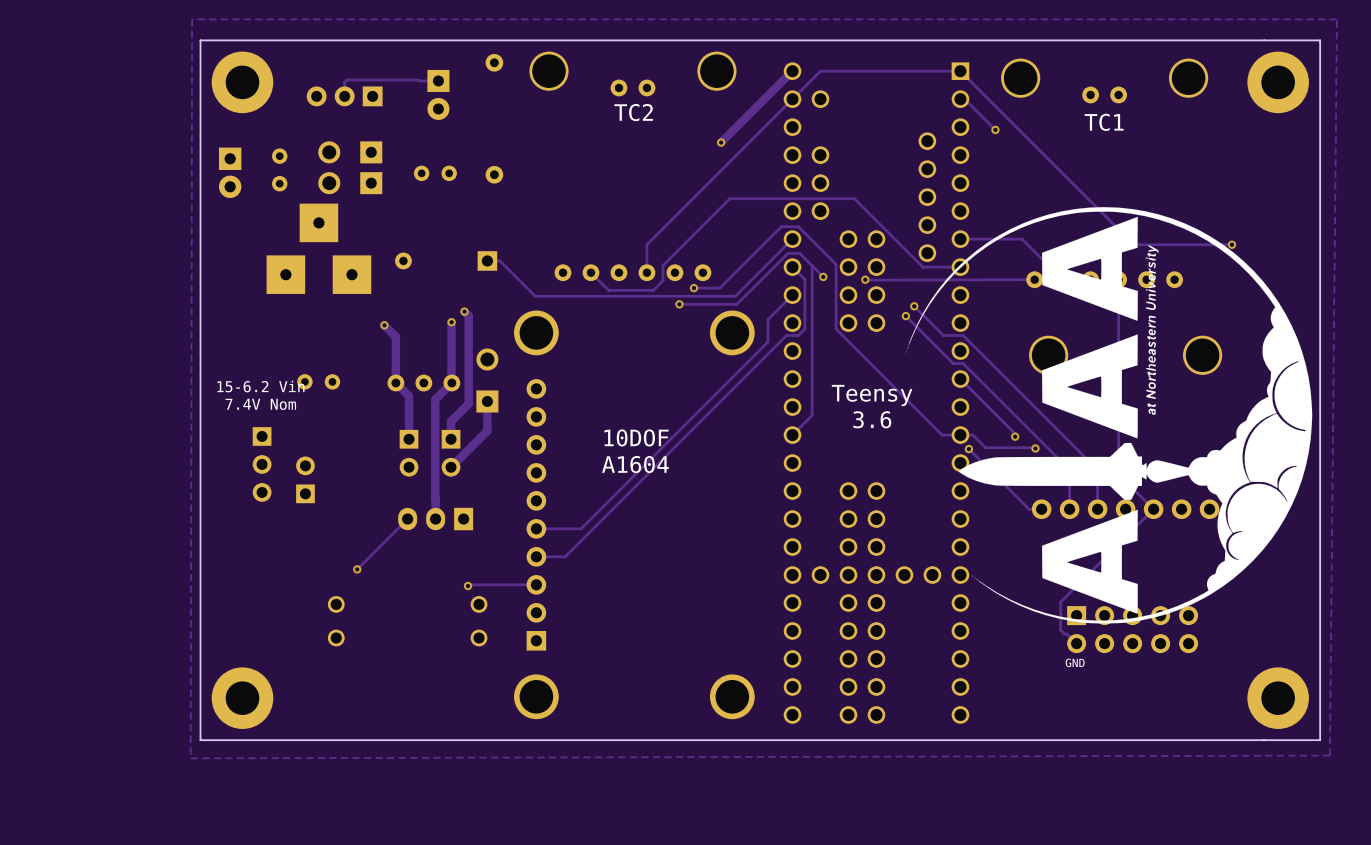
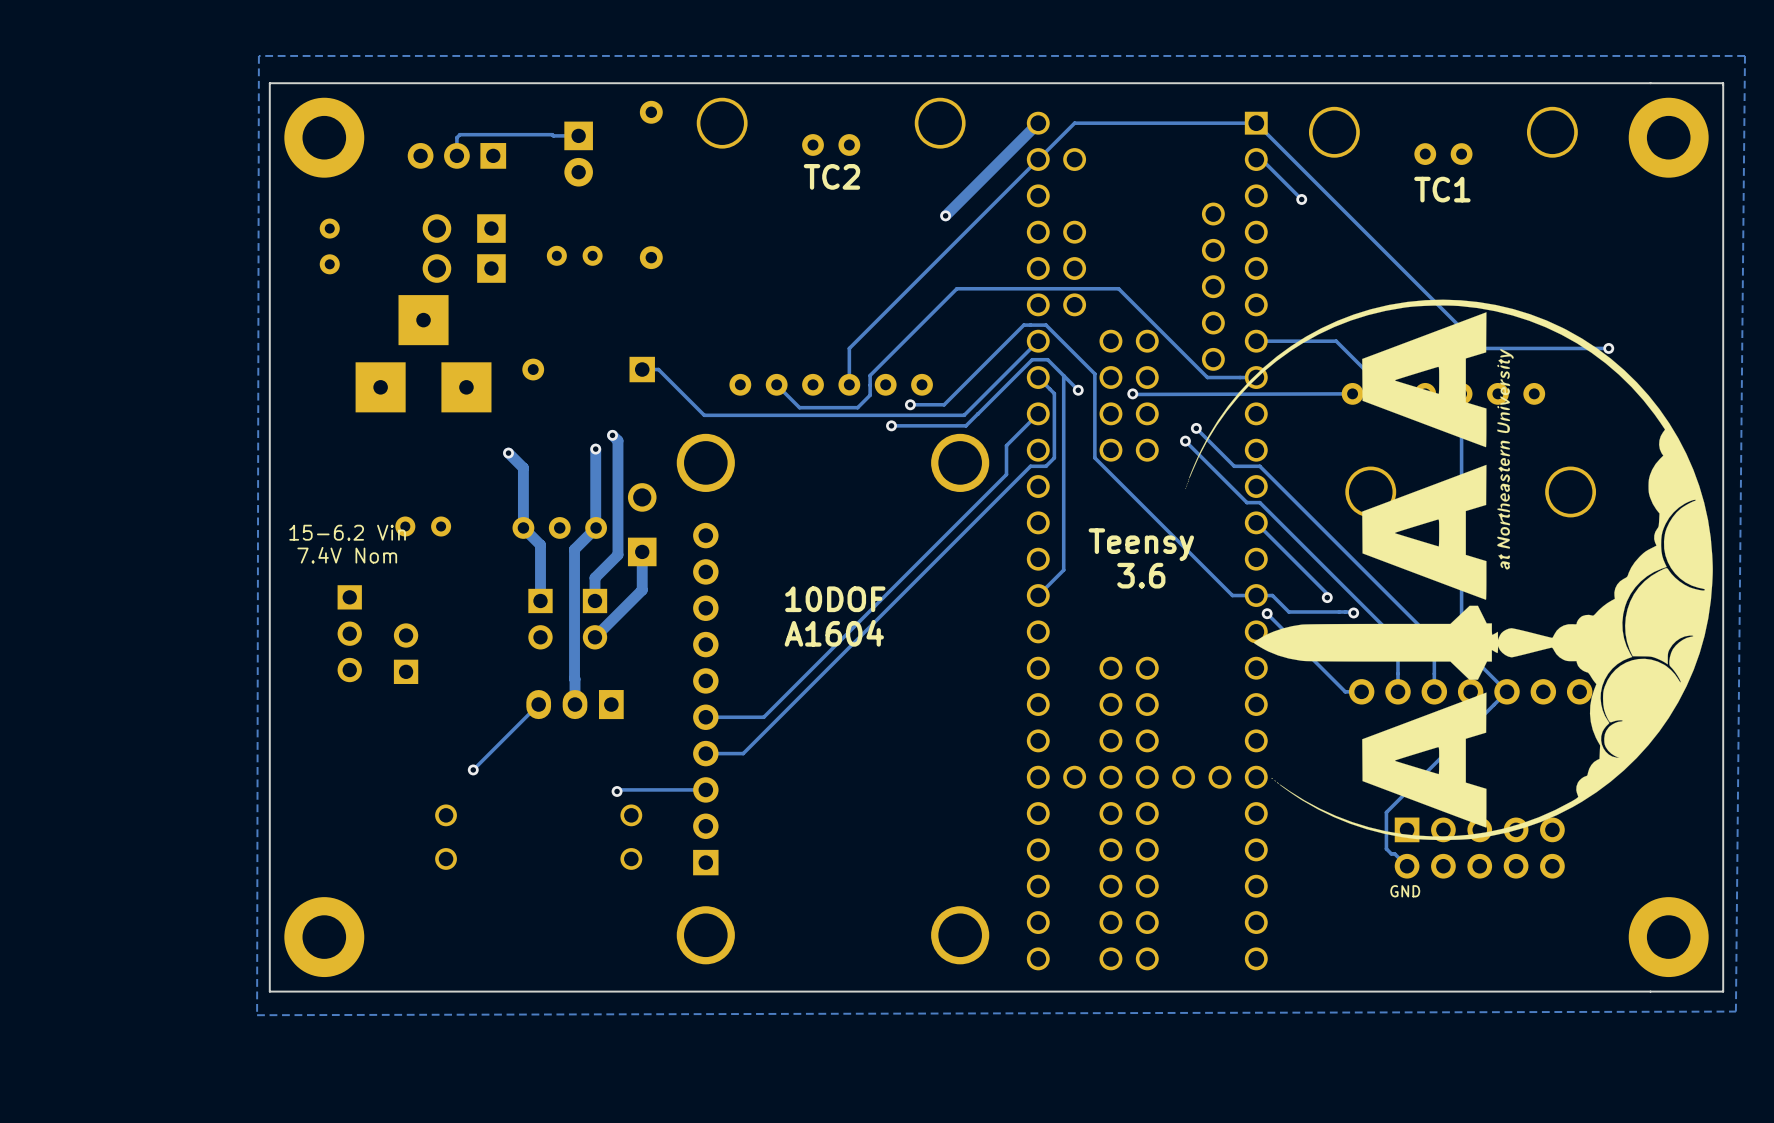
part position: (279, 169) -> (329, 246)
part: (230, 172) -> none

